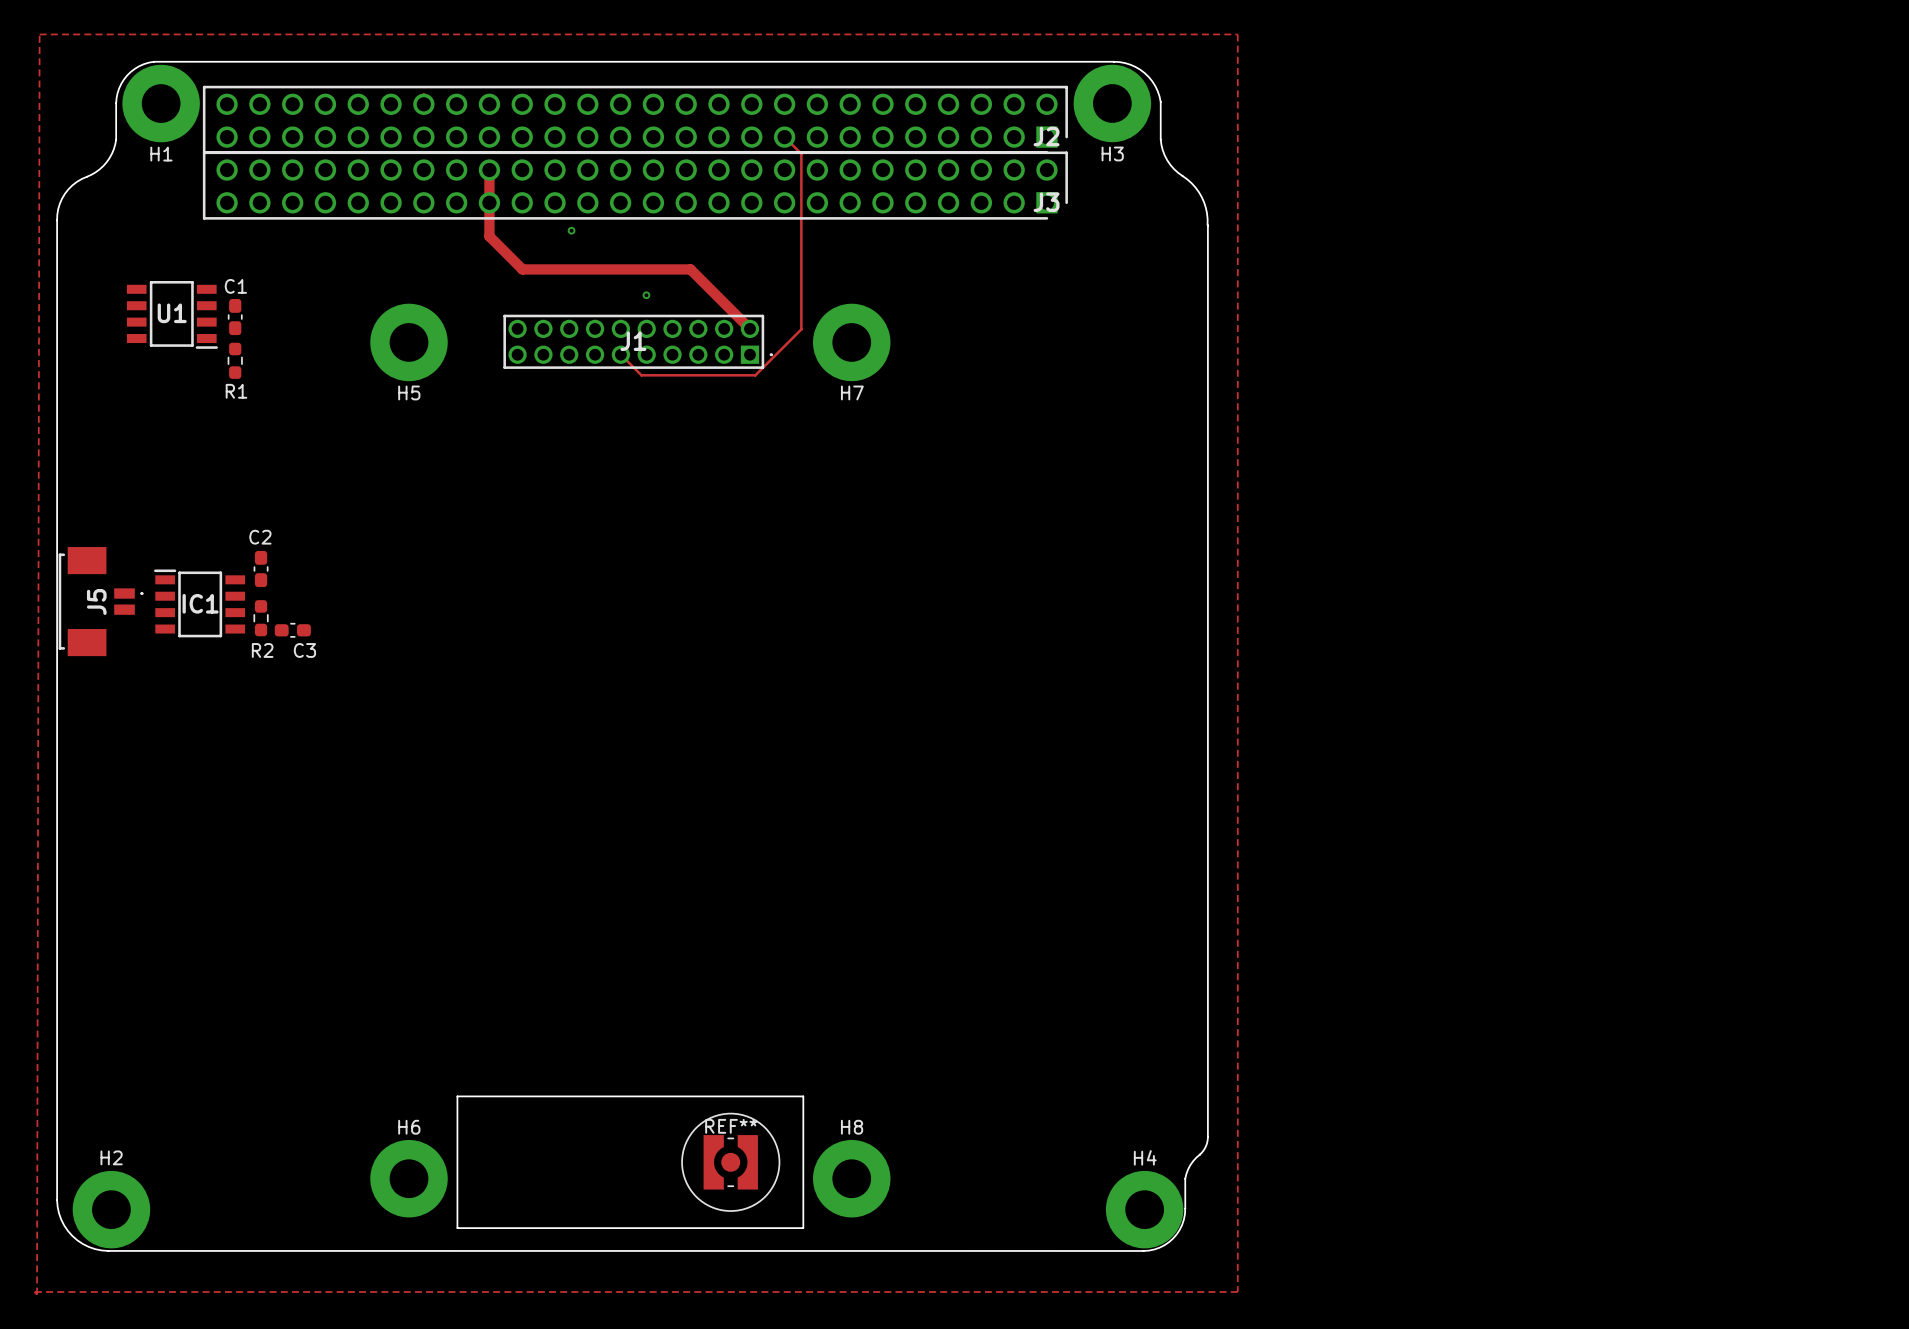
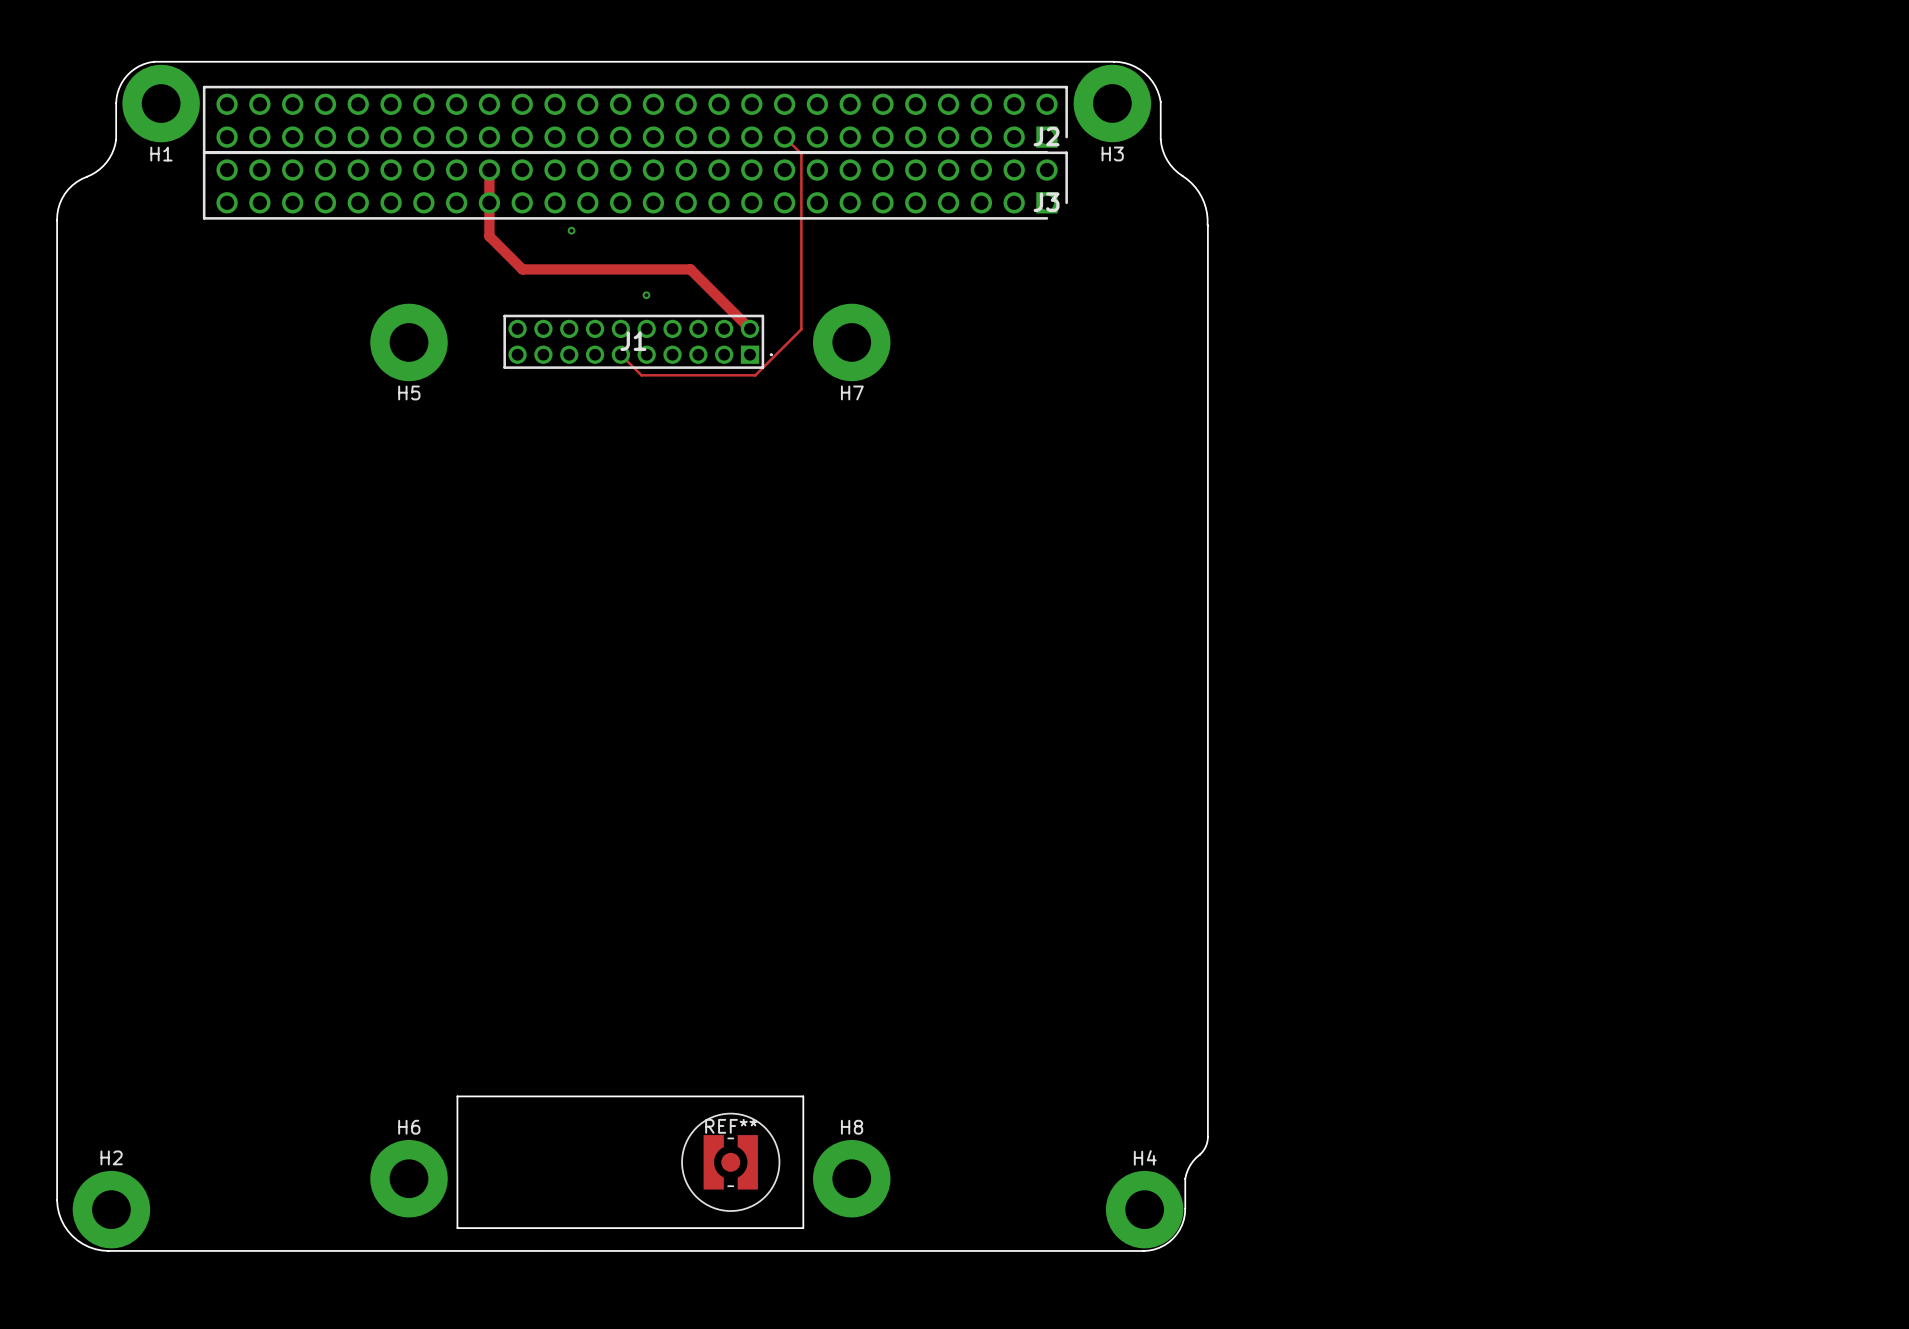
zone outline: (39, 34) (1237, 34) (1237, 1292) (34, 1292) (37, 1294) (39, 34) -> none
U1: (172, 314) -> none
C1: (235, 317) -> none
R1: (235, 360) -> none
C2: (261, 568) -> none
J5: (100, 601) -> none
IC1: (199, 603) -> none
R2: (261, 618) -> none
C3: (292, 630) -> none

